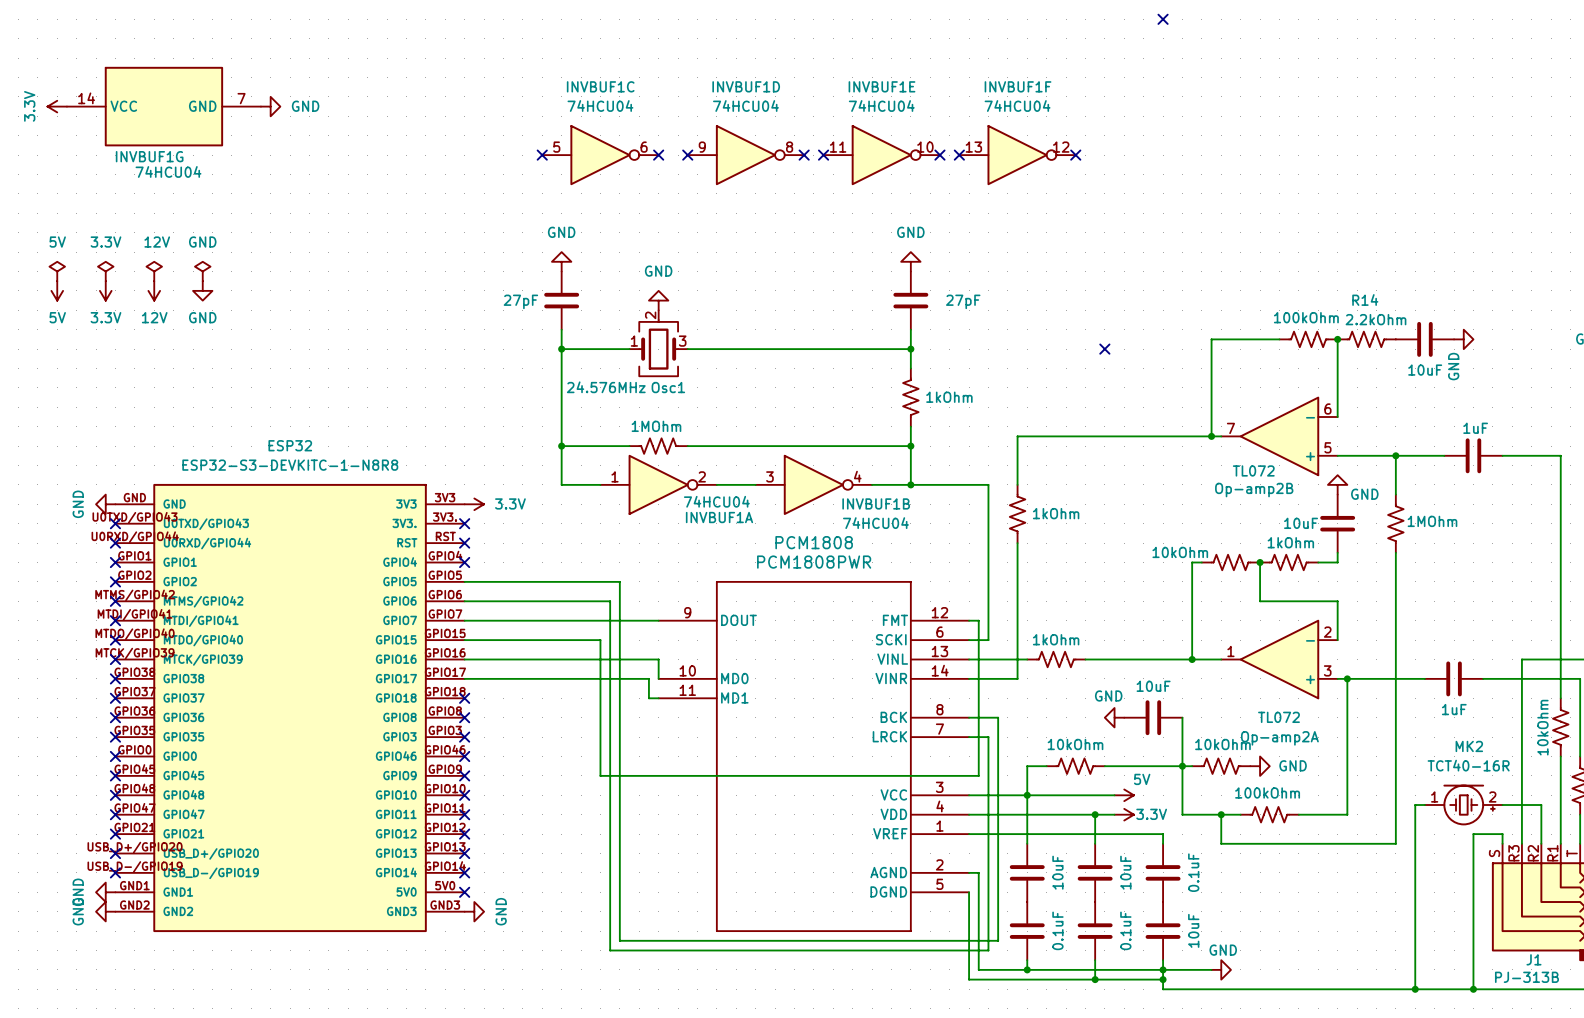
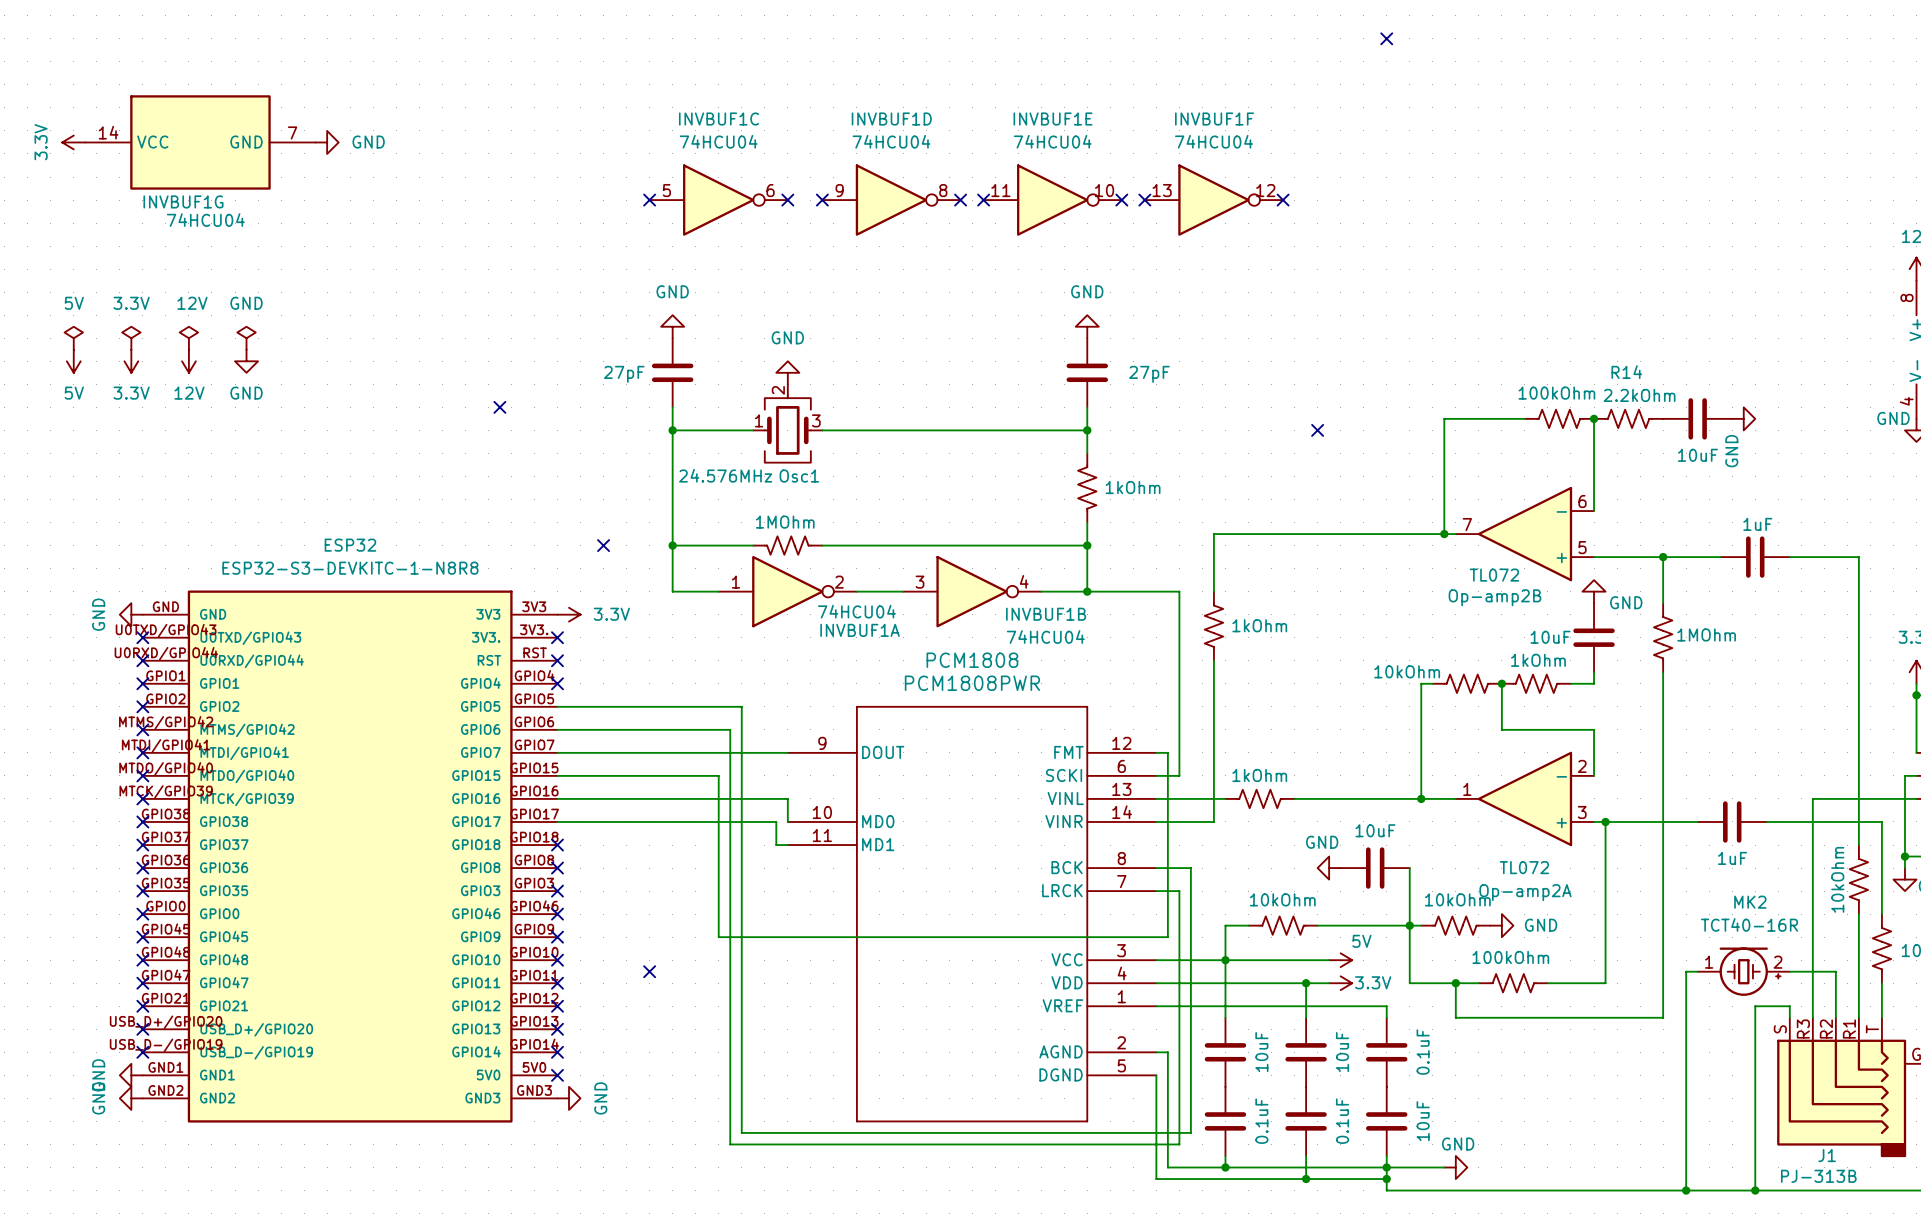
no-connect mark: none -> (499, 407)
no-connect mark: none -> (603, 545)
no-connect mark: none -> (649, 971)

